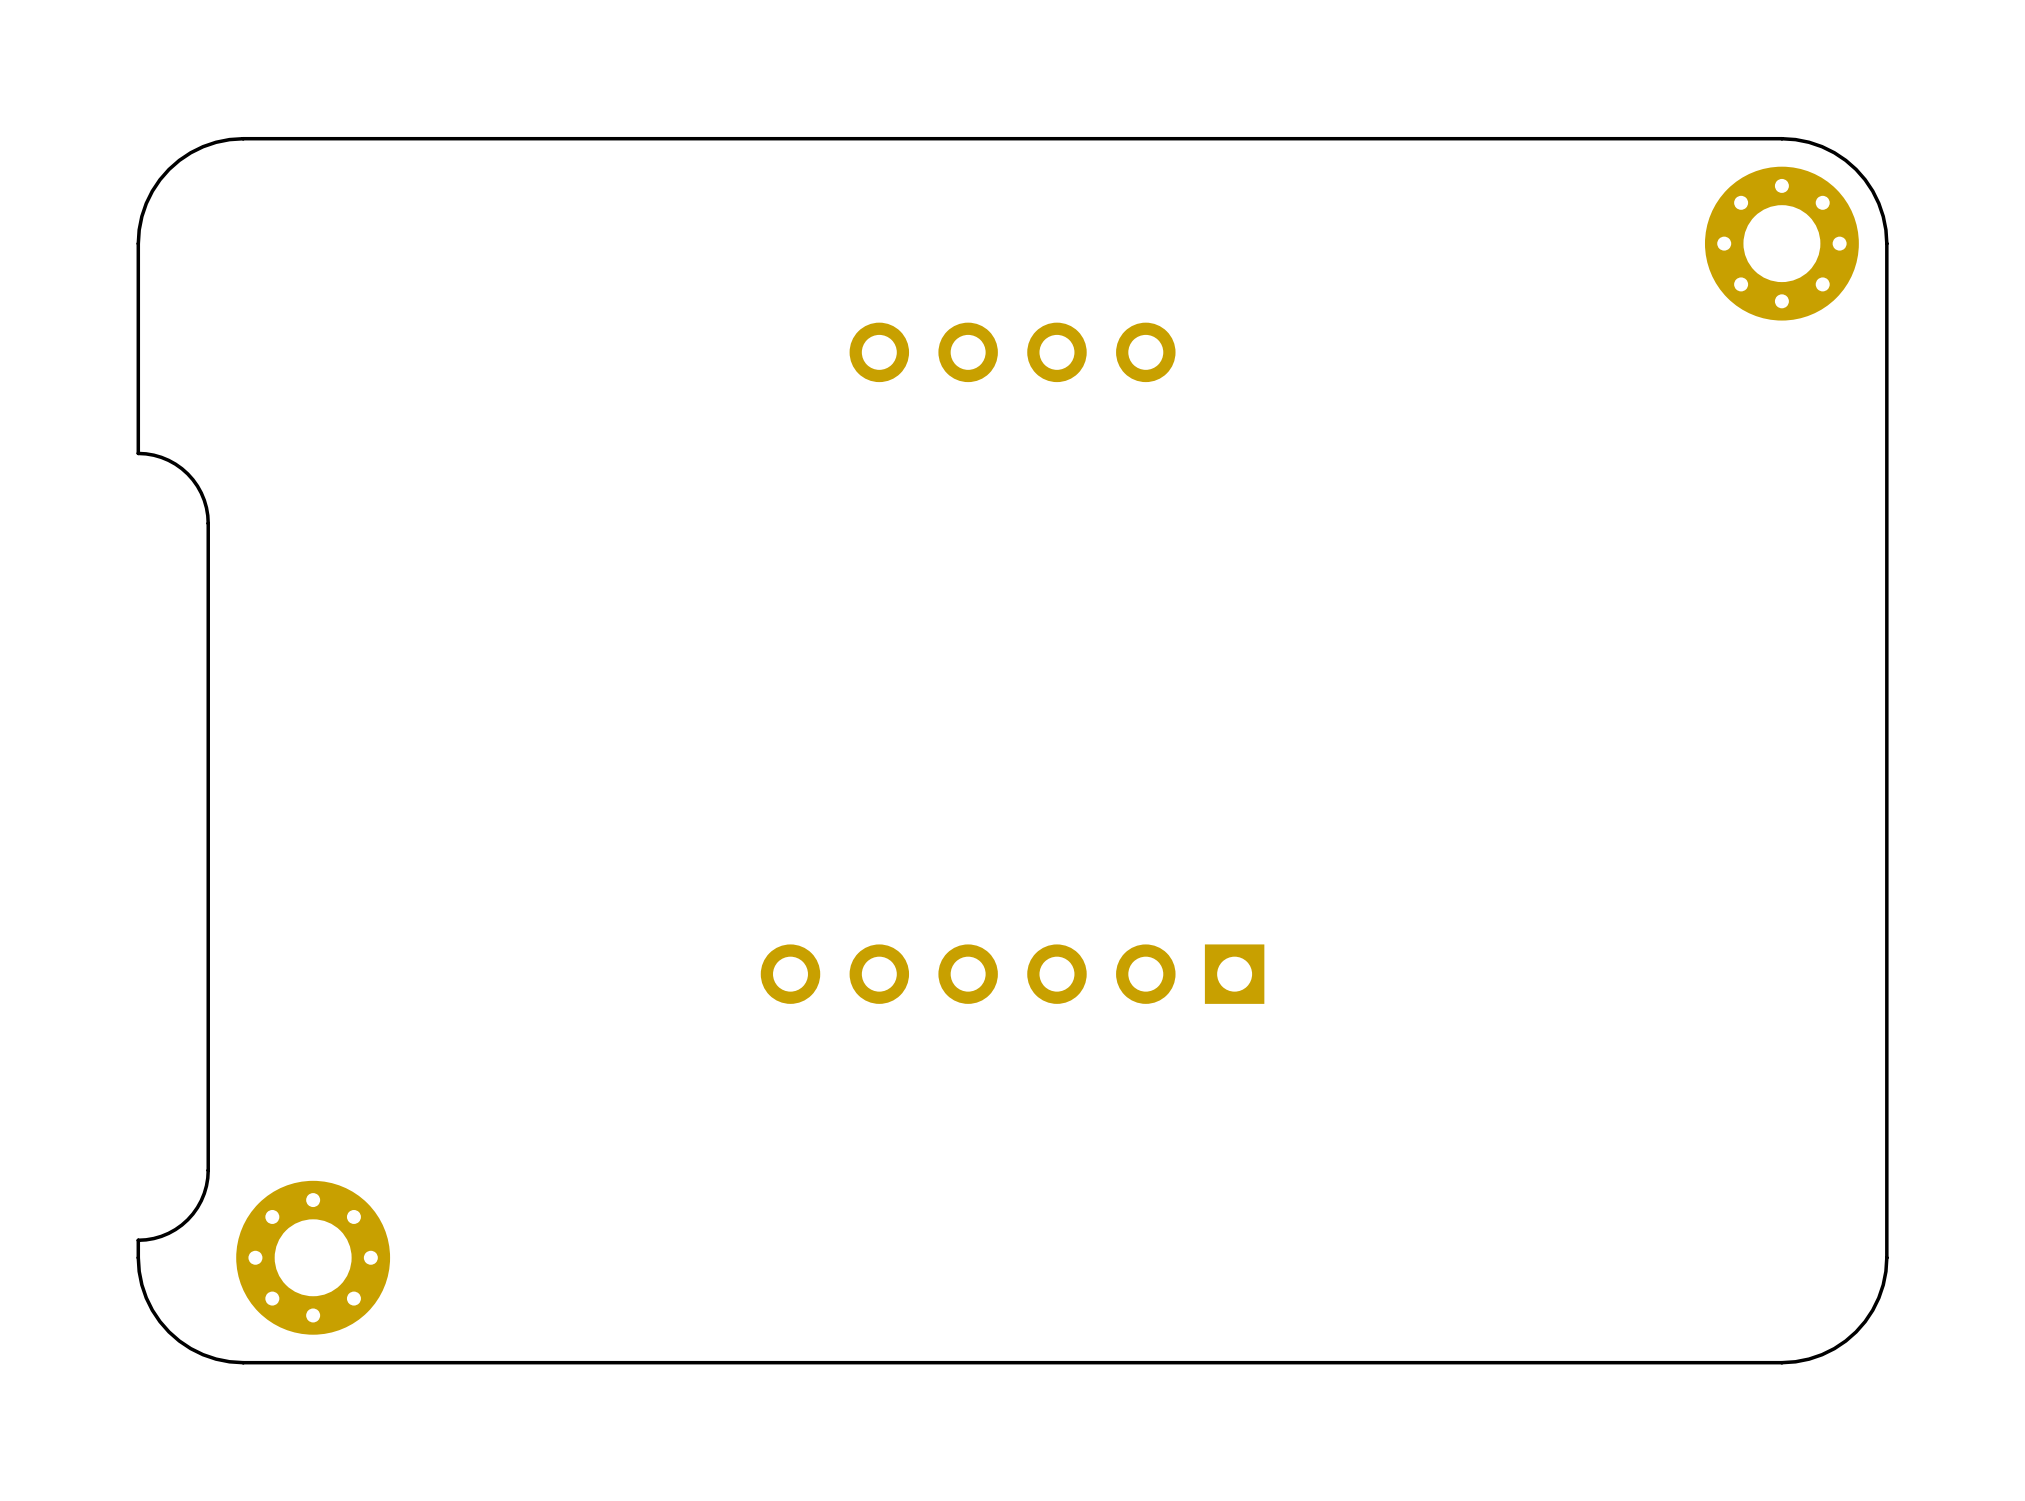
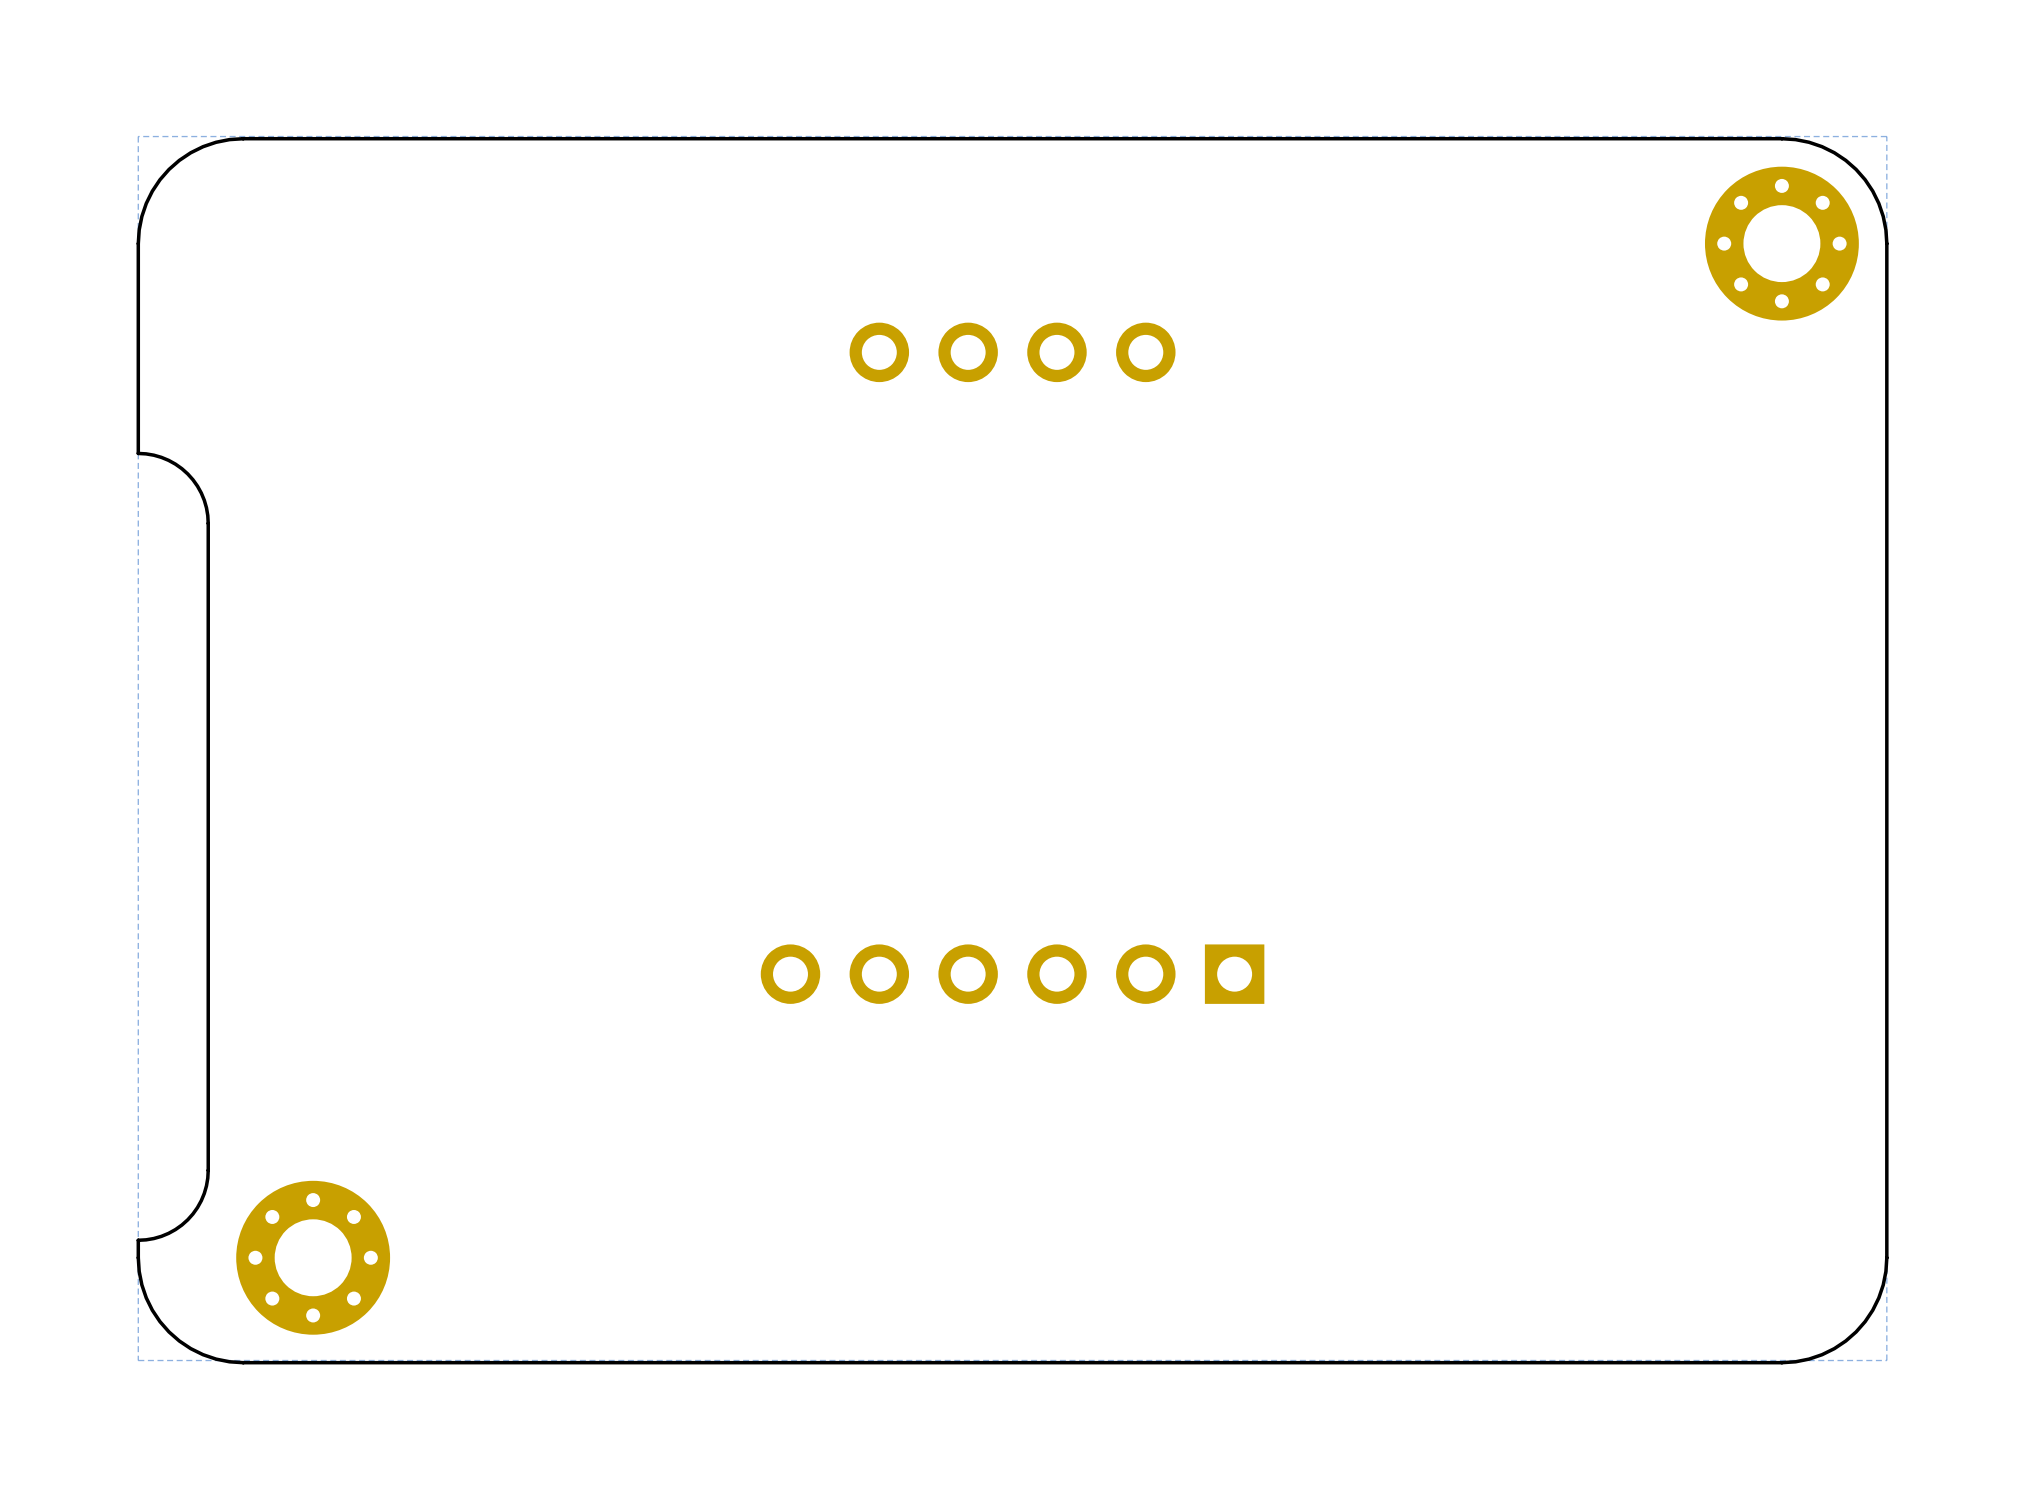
zone outline: none -> (1886, 136) (1886, 1360) (138, 1360) (138, 136) (1886, 136)

